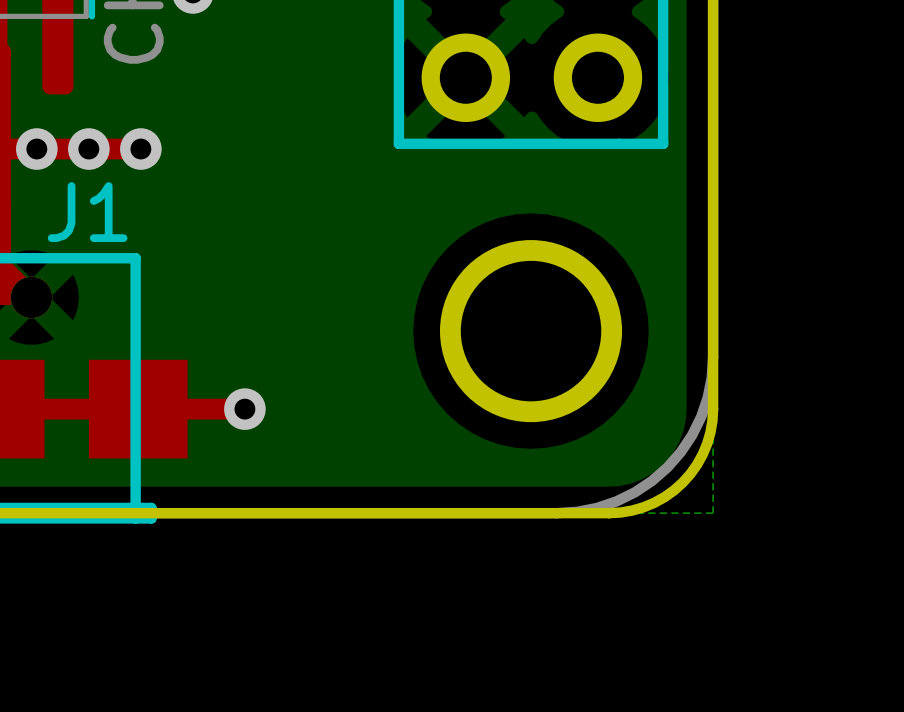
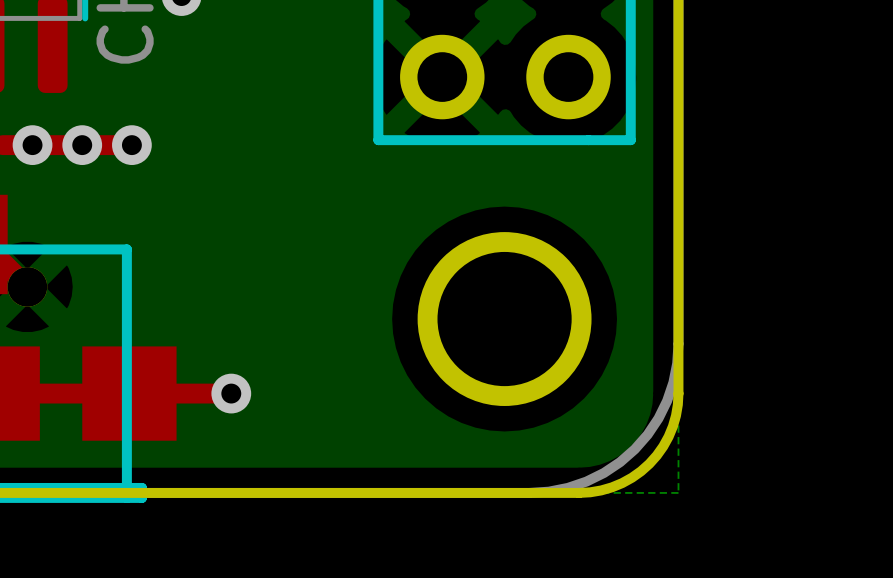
J1 name: J1 (87, 212) -> none

